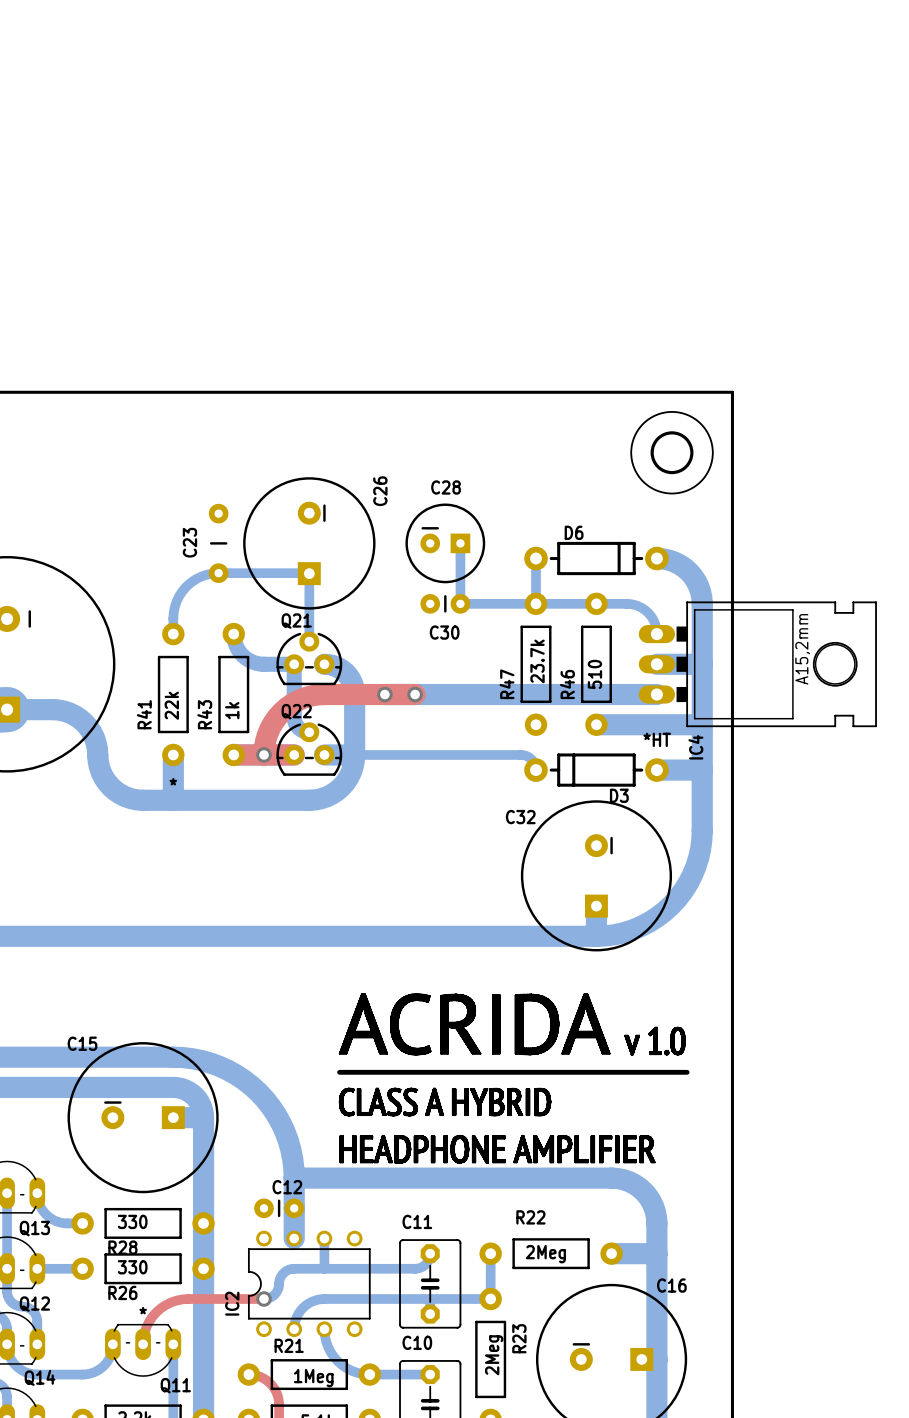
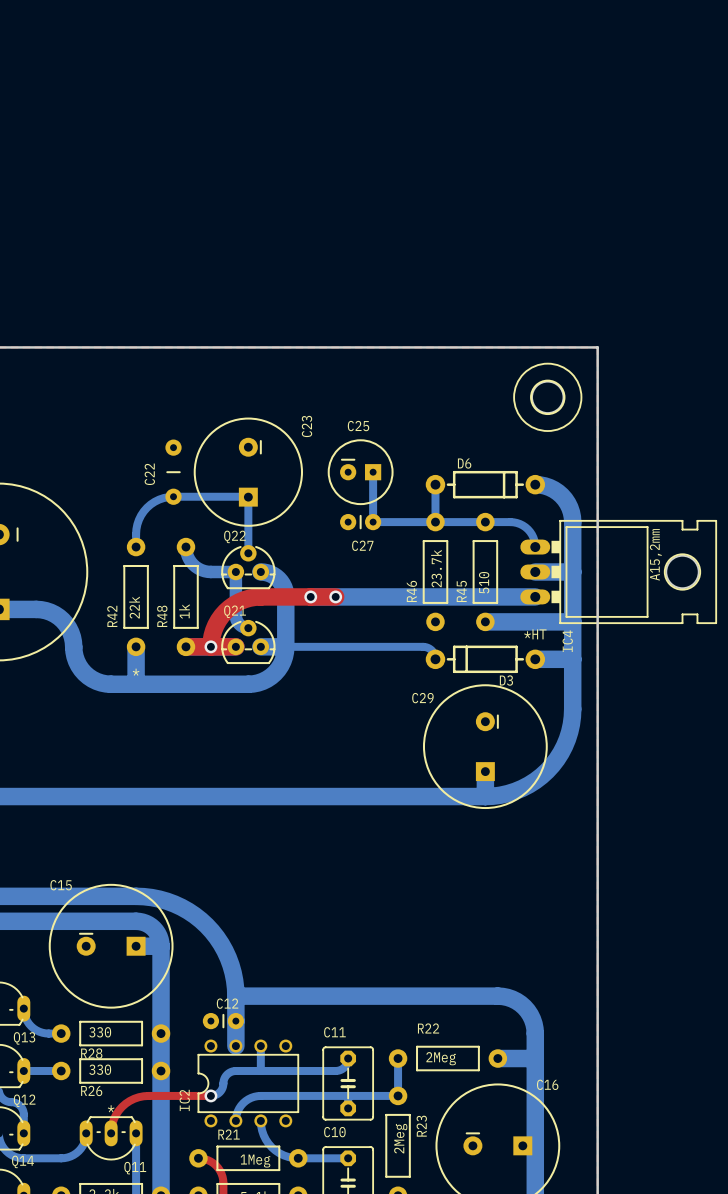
C28 name: C28 (446, 487) -> C25 (358, 426)
C26 name: C26 (380, 491) -> C23 (306, 426)
C23 name: C23 (189, 542) -> C22 (149, 474)
Q21 name: Q21 (296, 621) -> Q22 (234, 536)
C30 name: C30 (444, 632) -> C27 (362, 545)
R47 name: R47 (507, 684) -> R46 (411, 591)
R46 name: R46 (567, 684) -> R45 (461, 591)
Q22 name: Q22 (296, 711) -> Q21 (235, 611)
R41 name: R41 (144, 714) -> R42 (112, 616)
R43 name: R43 (204, 714) -> R48 (162, 616)
C32 name: C32 (520, 817) -> C29 (422, 698)
drawing: [337, 993, 690, 1164] -> none

